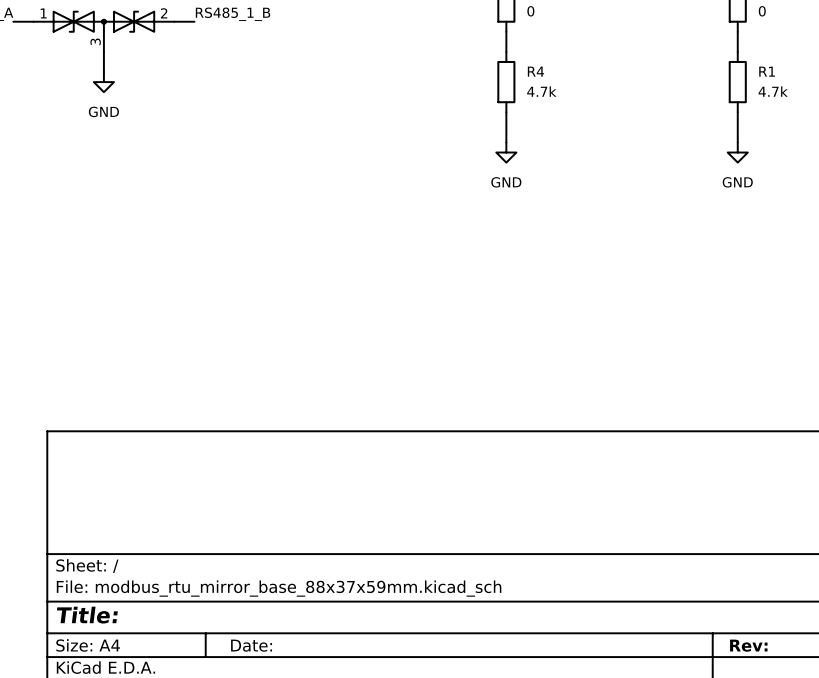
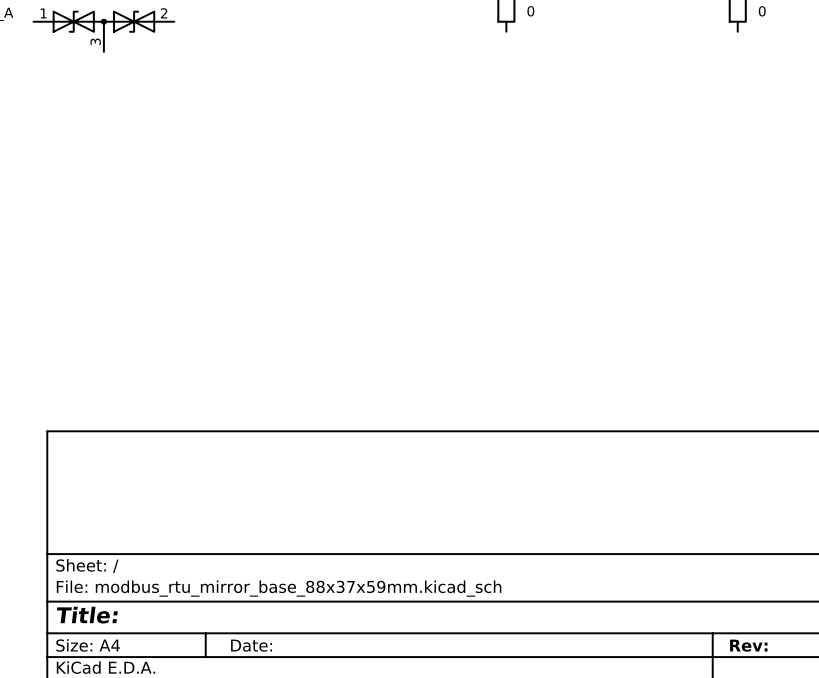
label: RS485_1_B (233, 14) -> none
wire: (13, 21) (33, 21) -> none
wire: (174, 21) (194, 21) -> none
wire: (506, 31) (506, 51) -> none
wire: (737, 31) (737, 51) -> none
wire: (103, 51) (103, 72) -> none
power symbol: GND (103, 82) -> none
R4: 4.7k (506, 82) -> none
R1: 4.7k (737, 82) -> none
wire: (506, 112) (506, 142) -> none
wire: (737, 112) (737, 142) -> none
power symbol: GND (506, 152) -> none
power symbol: GND (737, 152) -> none

